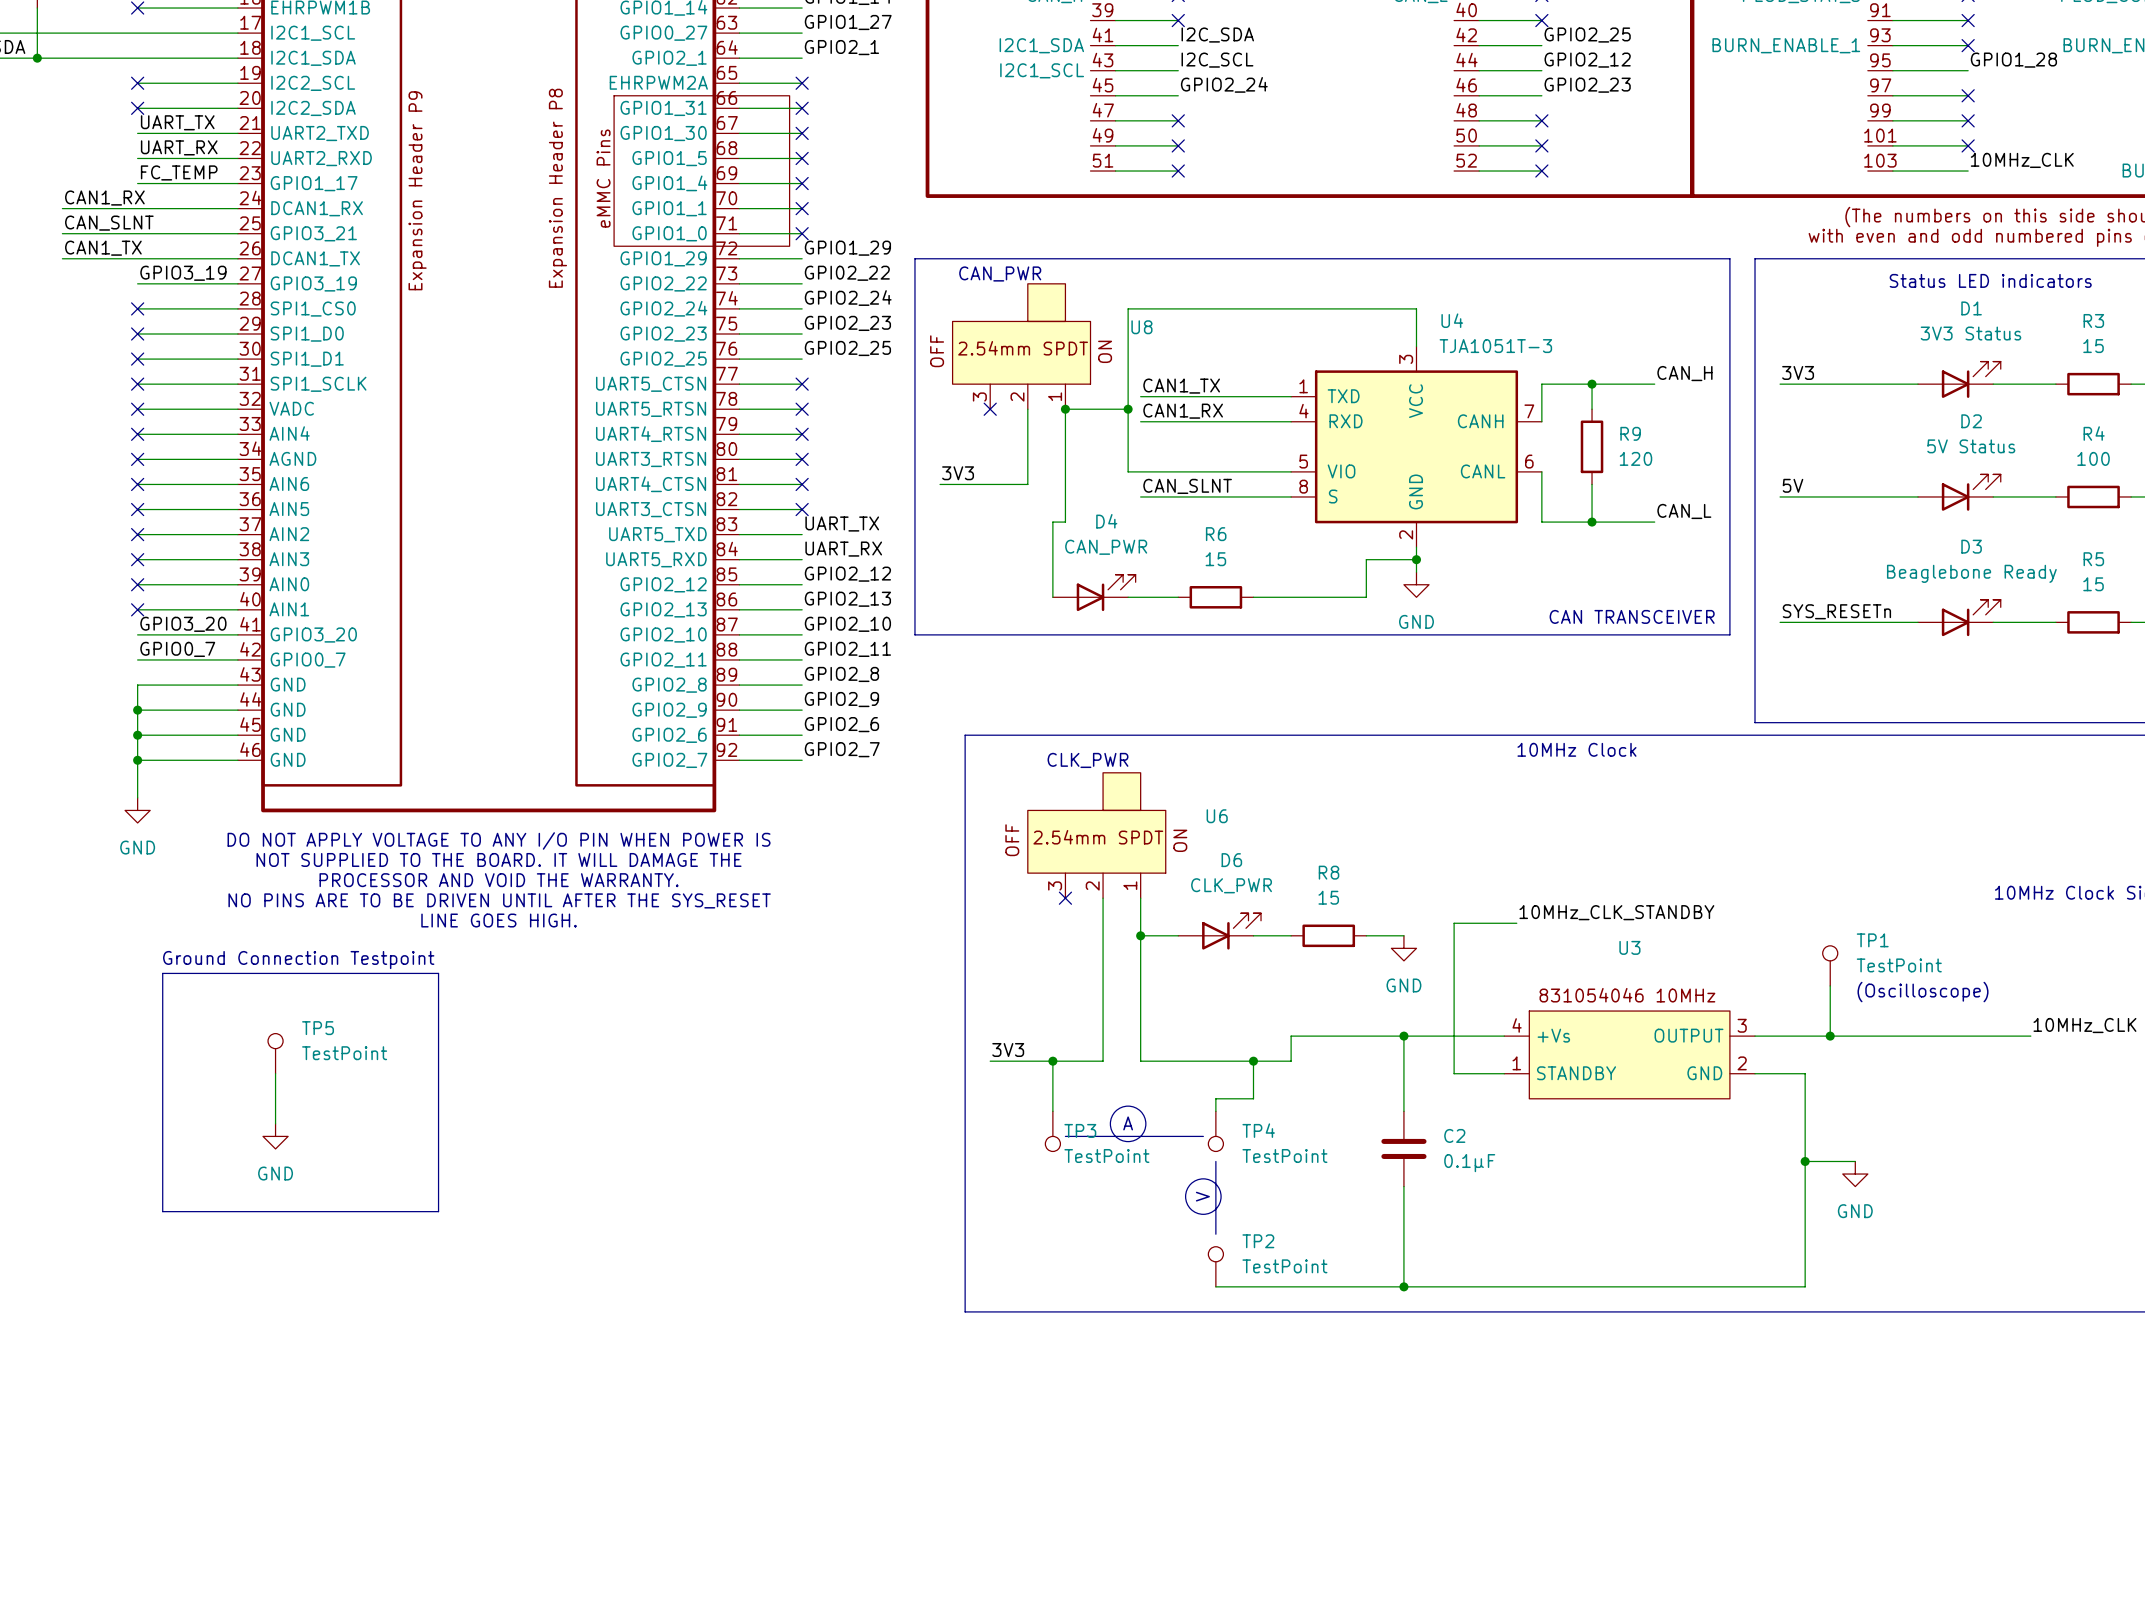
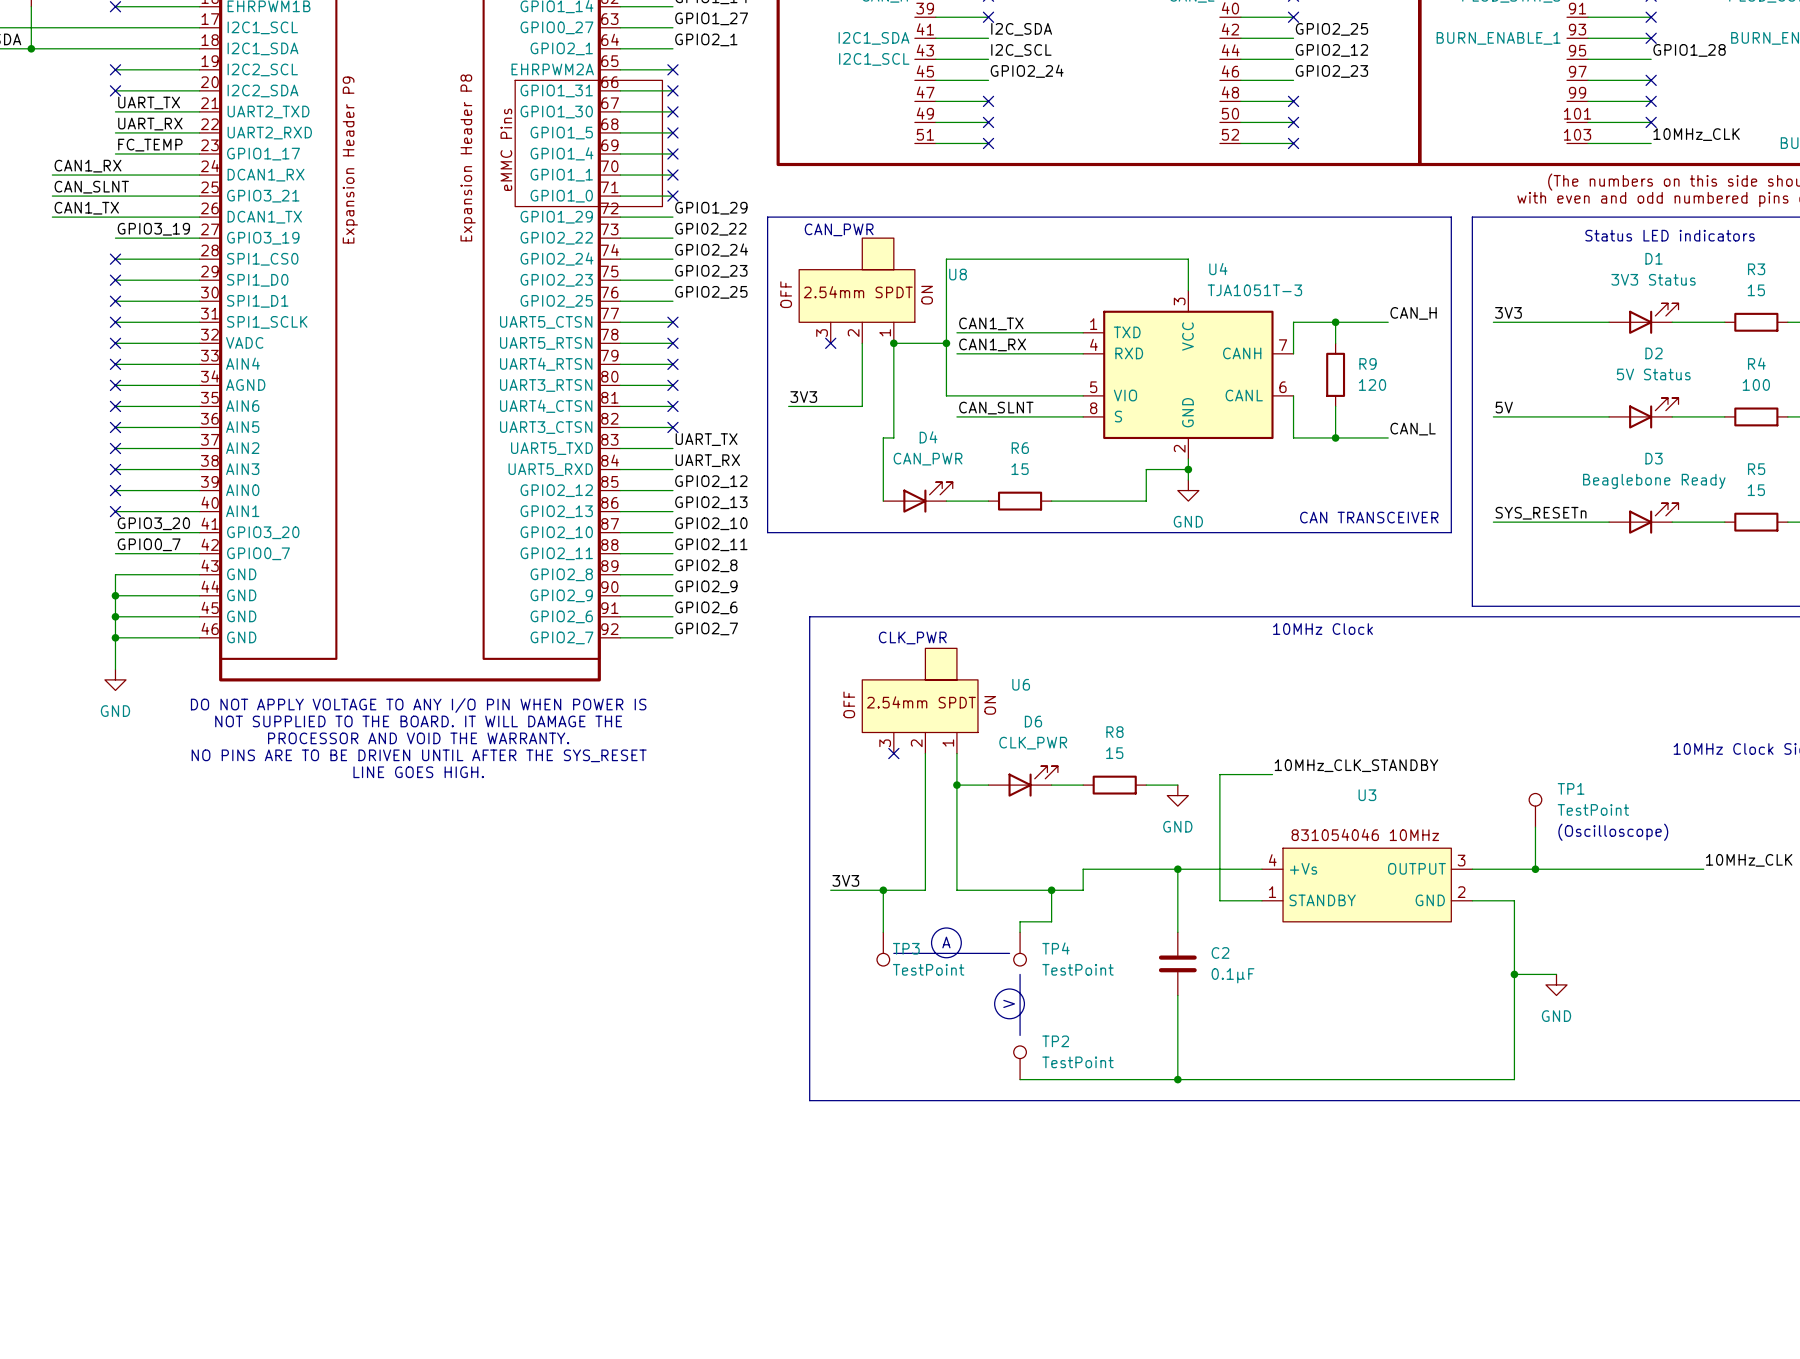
text: Ground Connection Testpoint (298, 960) -> none
line: (162, 973) (438, 973) (438, 1211) (162, 1211) (162, 973) -> none
TP5: TestPoint (275, 1053) -> none
wire: (275, 1073) (275, 1123) -> none
power symbol: GND (275, 1136) -> none

